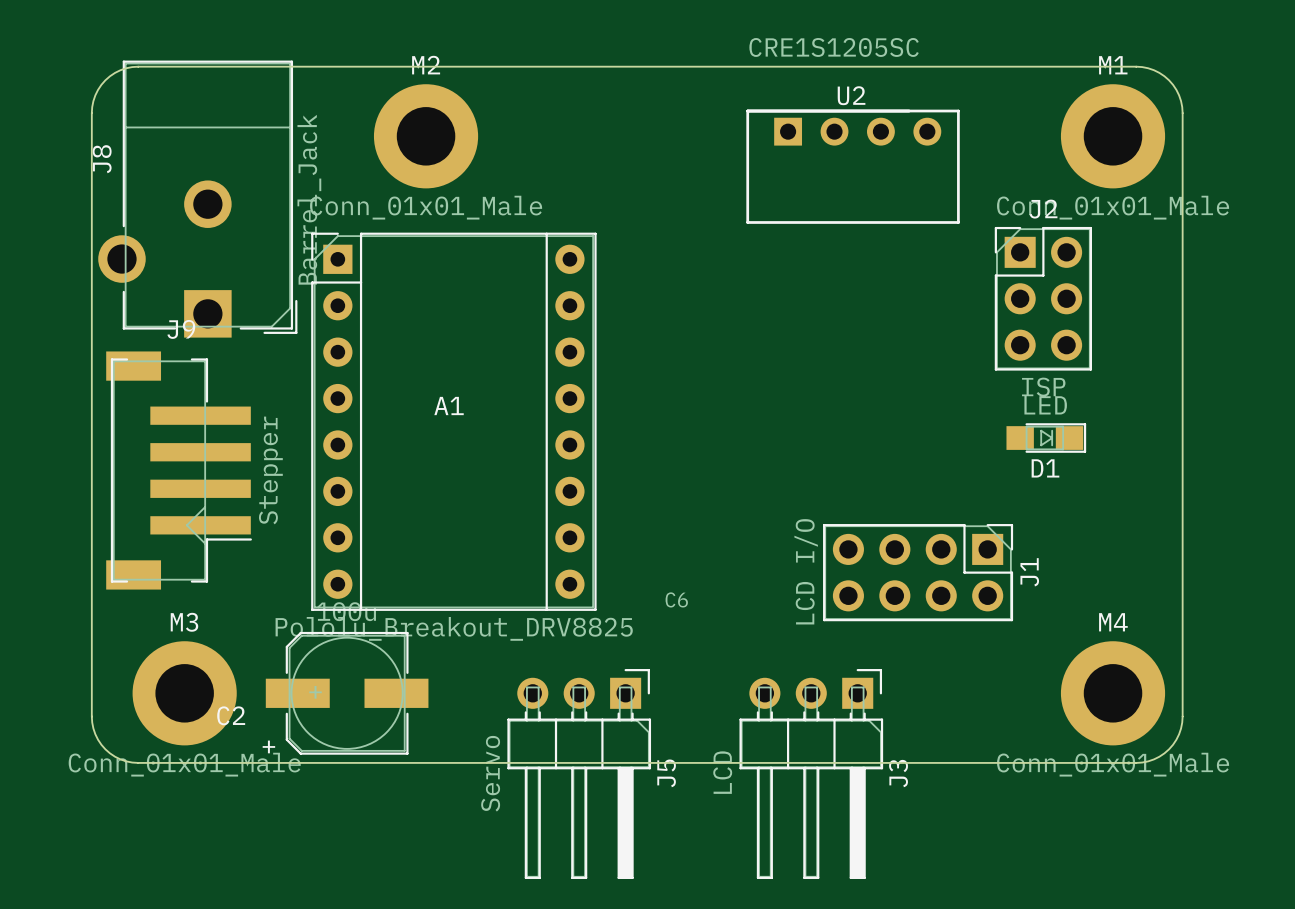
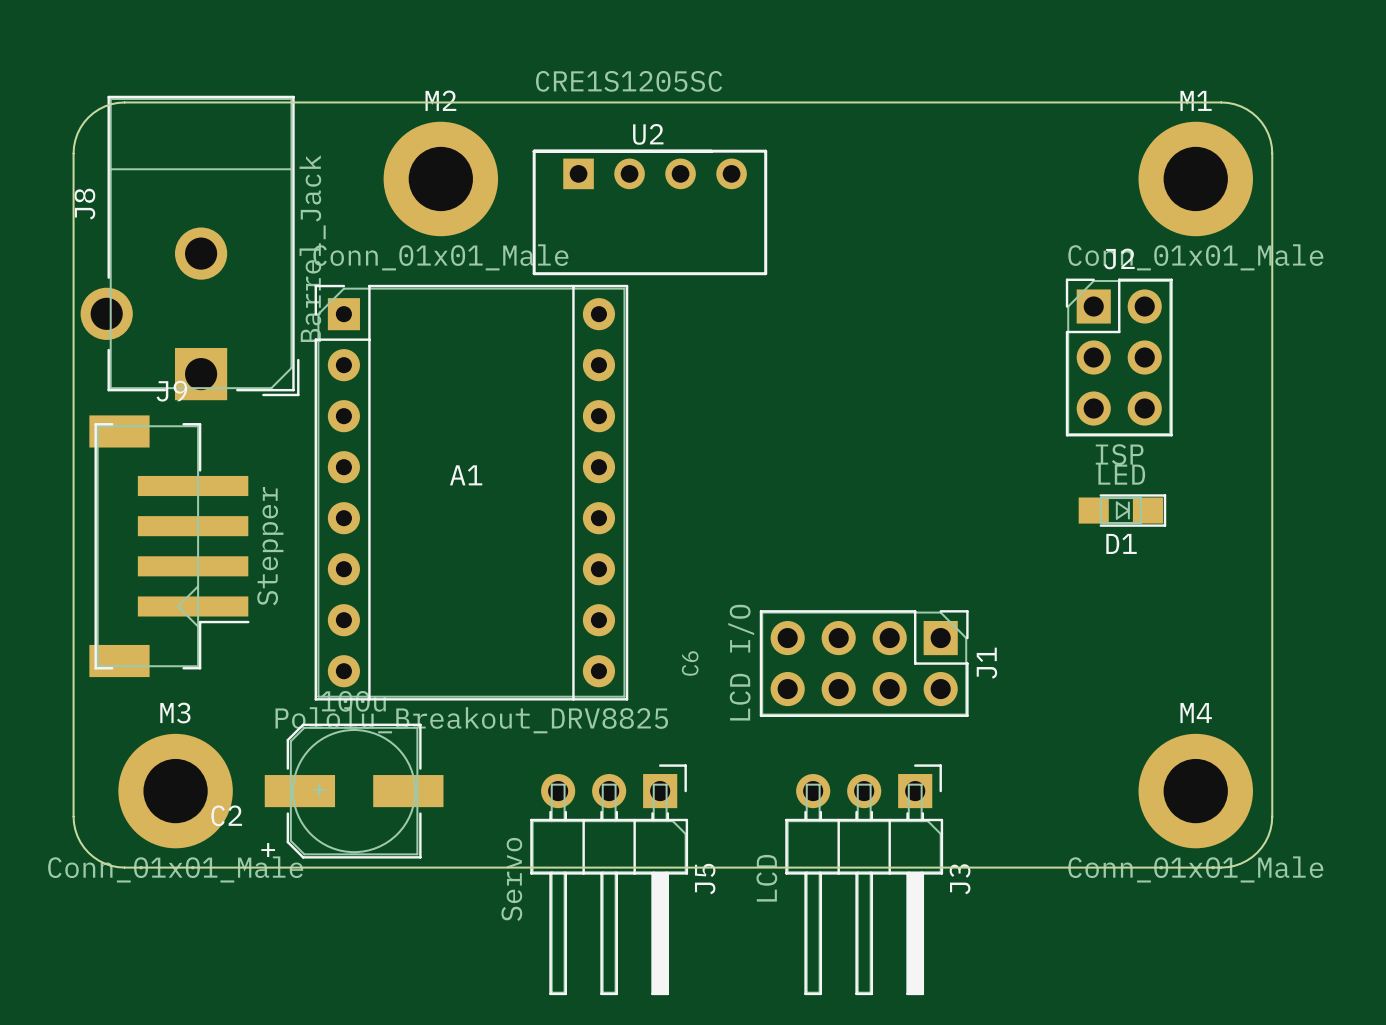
U2 position: (853, 166) -> (649, 212)
J1 position: (918, 572) -> (864, 663)
C6 position: (676, 599) -> (690, 663)
C6 name rotation: 0° (676, 599) -> 90° counterclockwise (690, 663)

